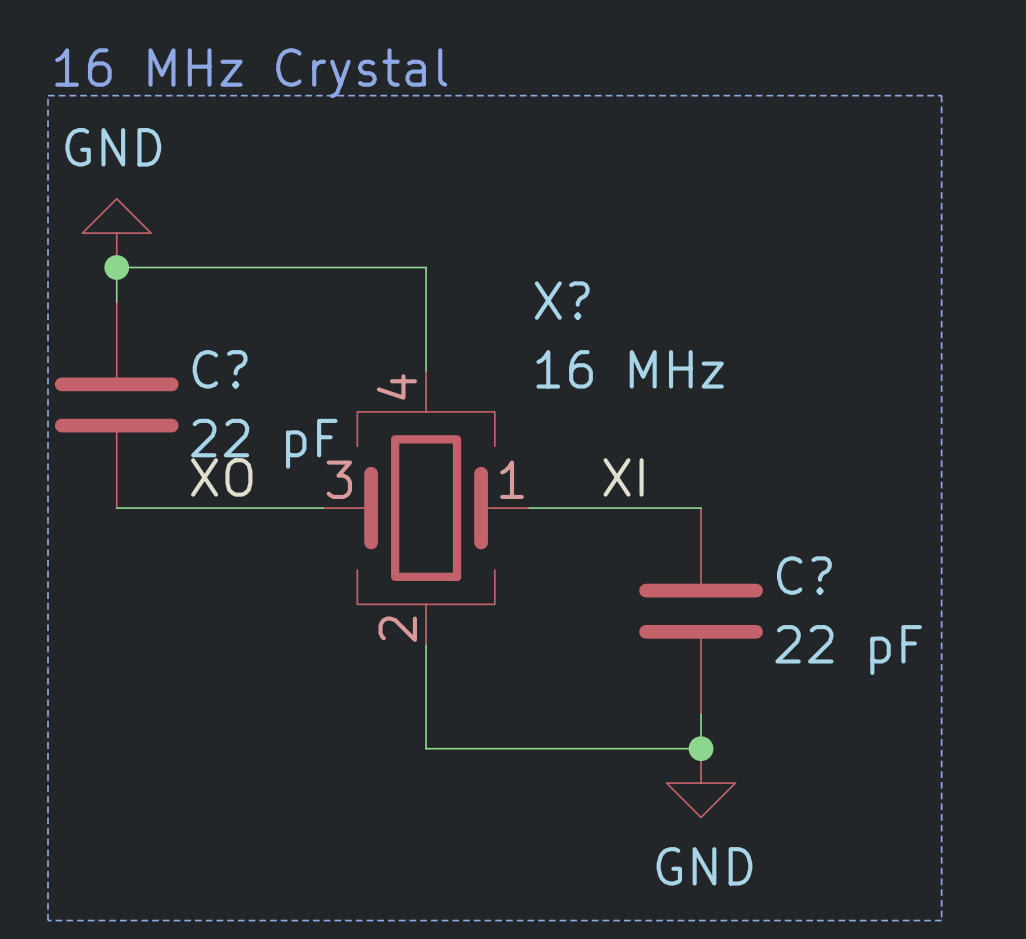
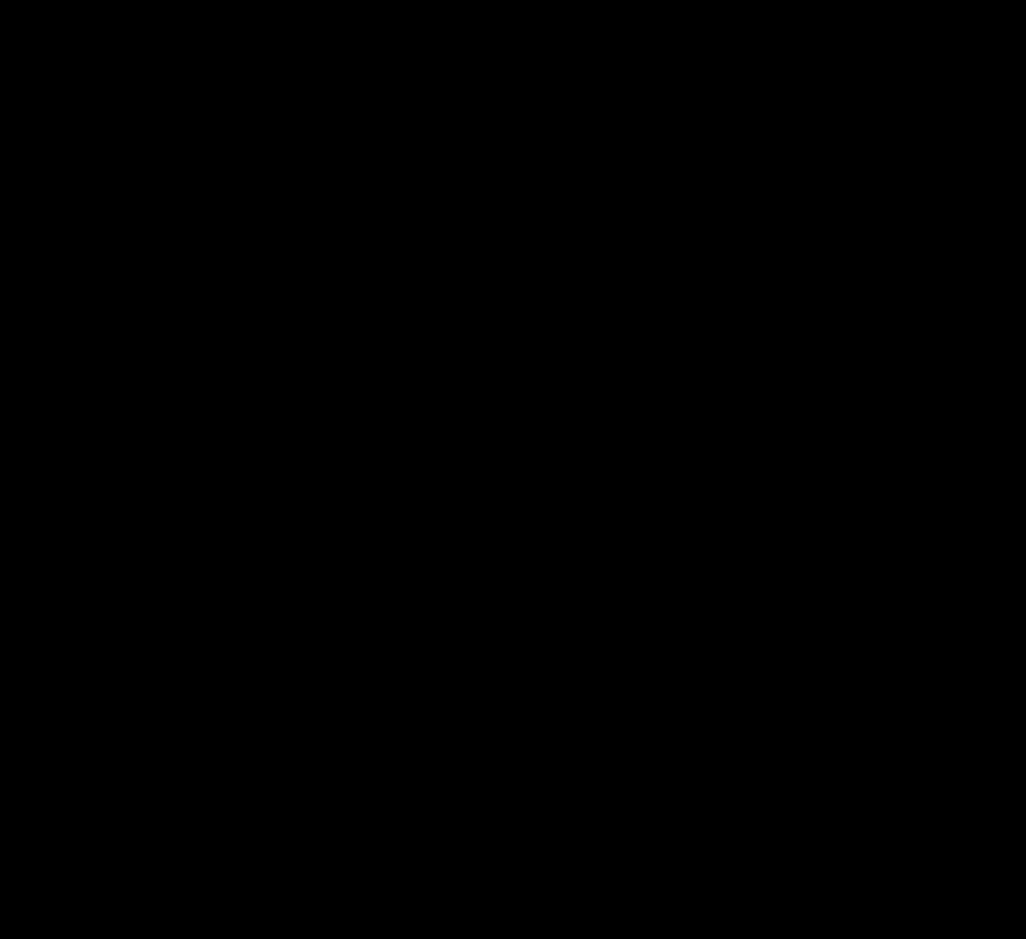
text: 16 MHz Crystal (251, 73) -> none
line: (48, 95) (941, 95) (941, 920) (48, 920) (48, 95) -> none
power symbol: GND (116, 233) -> none
junction: (116, 267) -> none
wire: (116, 301) (116, 267) (426, 267) (426, 370) -> none
C?: 22 pF (116, 404) -> none
label: XO (221, 477) -> none
label: XI (623, 477) -> none
wire: (116, 508) (322, 508) -> none
X?: 16 MHz (426, 508) -> none
wire: (529, 508) (701, 508) -> none
C?: 22 pF (701, 611) -> none
wire: (426, 645) (426, 748) (701, 748) (701, 714) -> none
junction: (701, 748) -> none
power symbol: GND (701, 783) -> none

